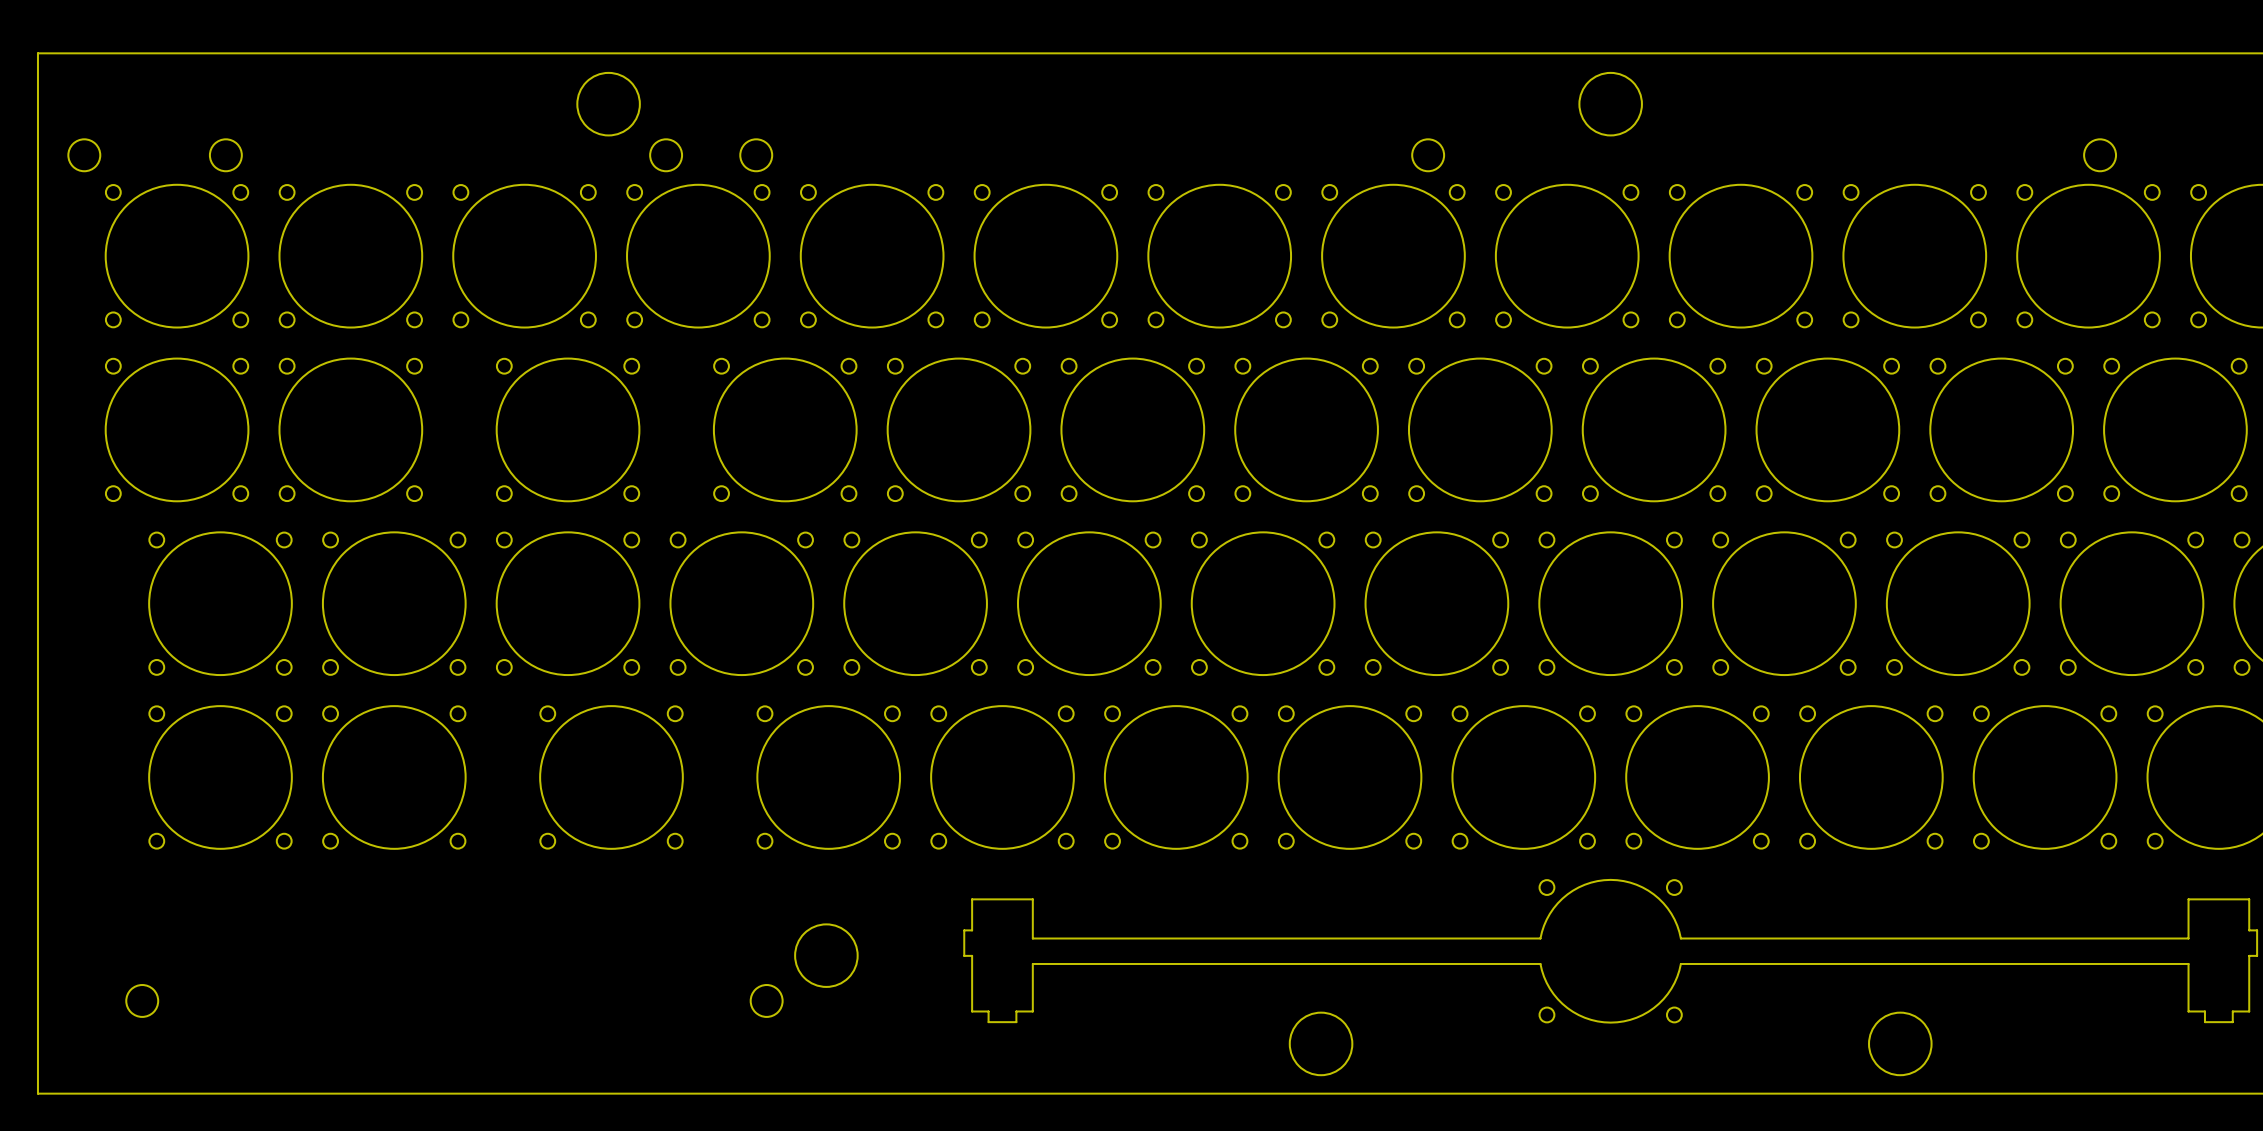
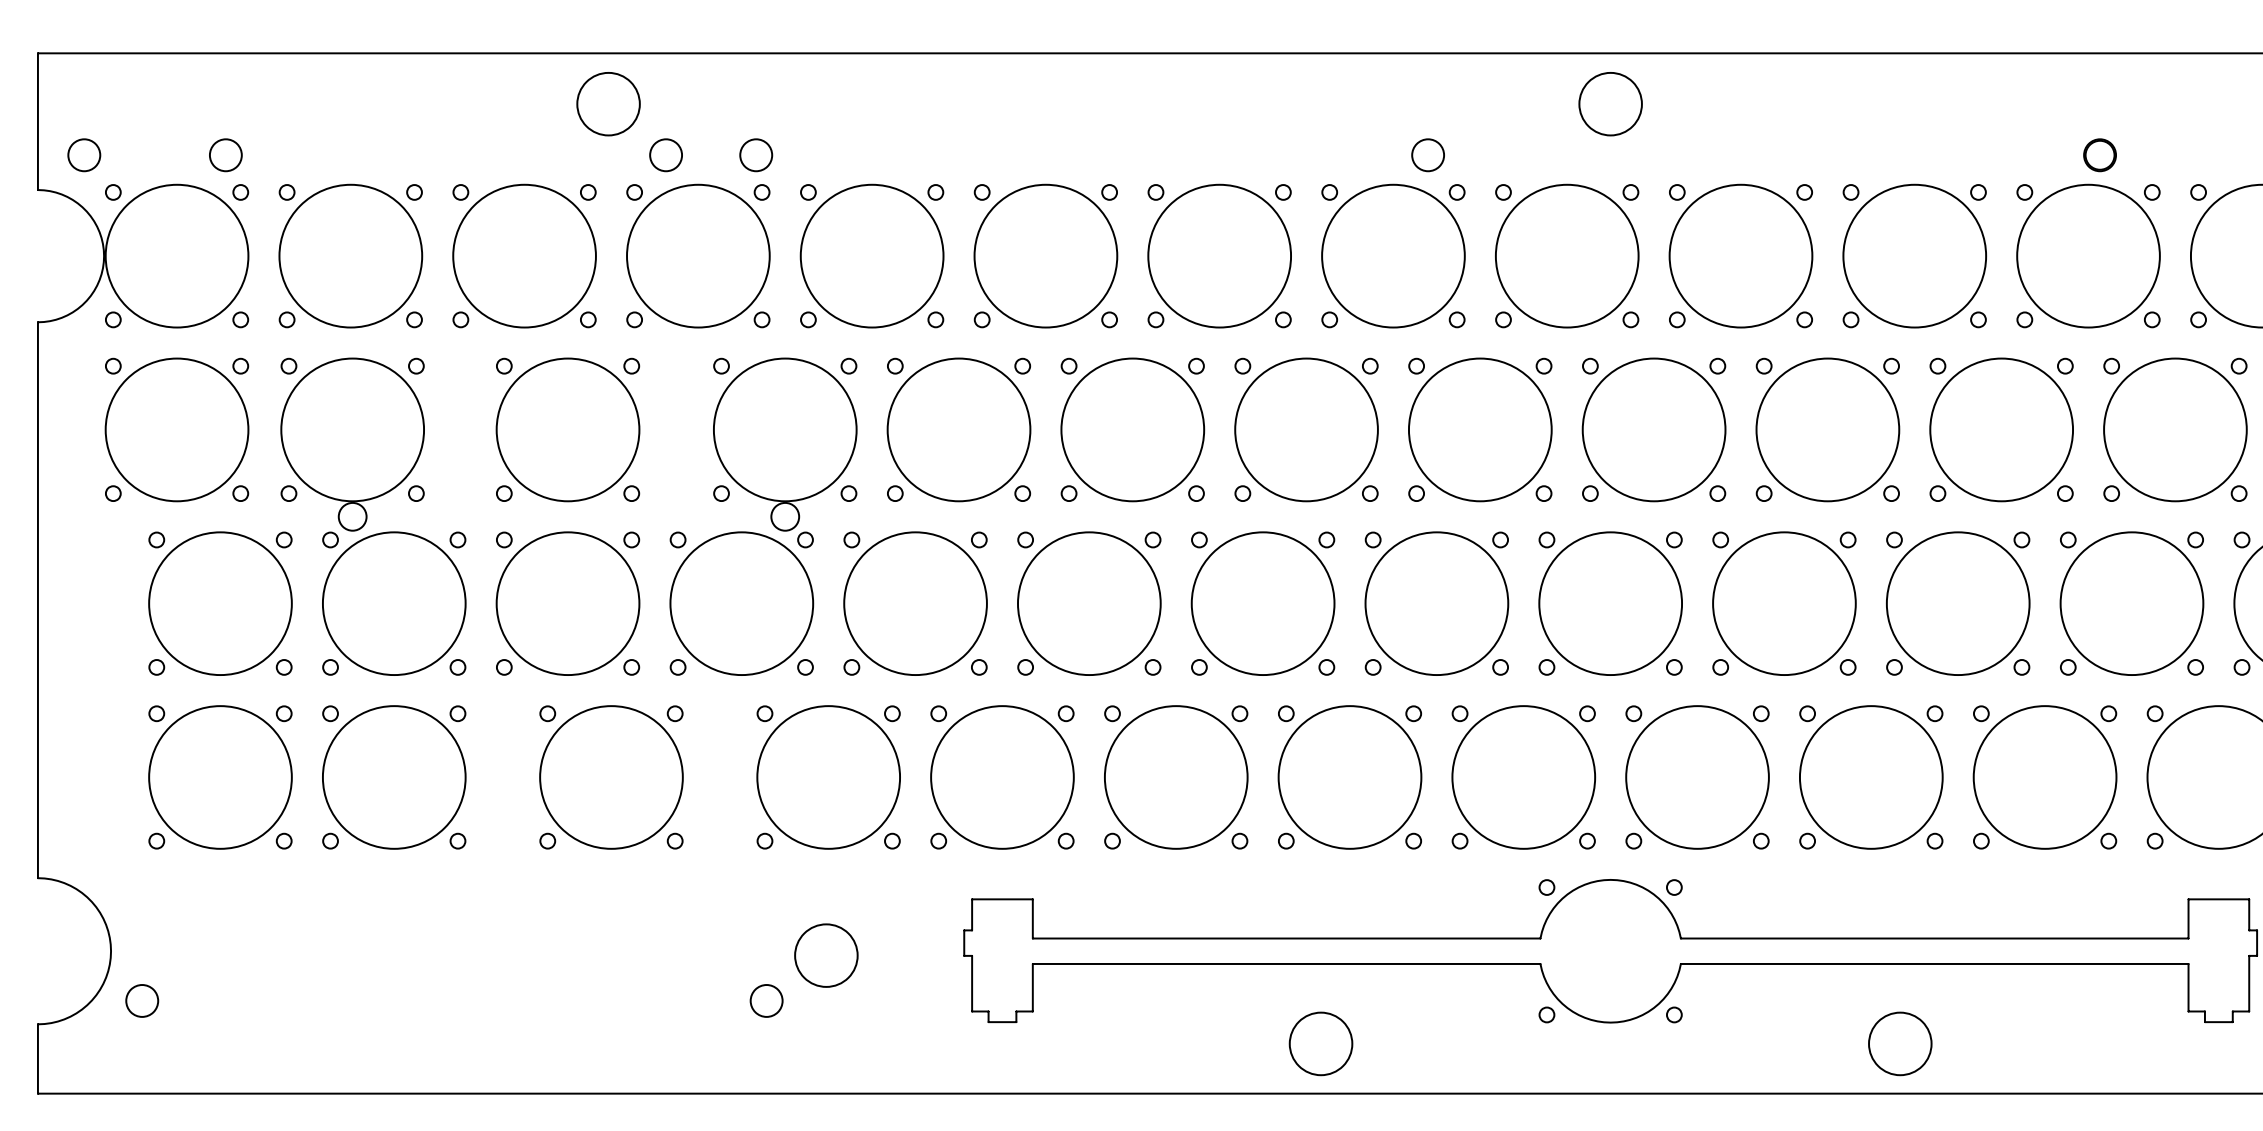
round board edge: none -> [2085, 140, 2116, 171]
board edge: (37, 190) (37, 322) -> (37, 190) (61, 194) (82, 207) (97, 226) (101, 238) (104, 256) (101, 274) (97, 285) (82, 305) (61, 317) (37, 322)
part: (350, 429) -> none
part: (785, 429) -> none
part: none -> (352, 444)
part: none -> (785, 444)
board edge: (37, 878) (37, 1024) -> (37, 878) (64, 883) (76, 889) (91, 902) (106, 924) (111, 951) (106, 977) (91, 1000) (82, 1009) (64, 1019) (37, 1024)

